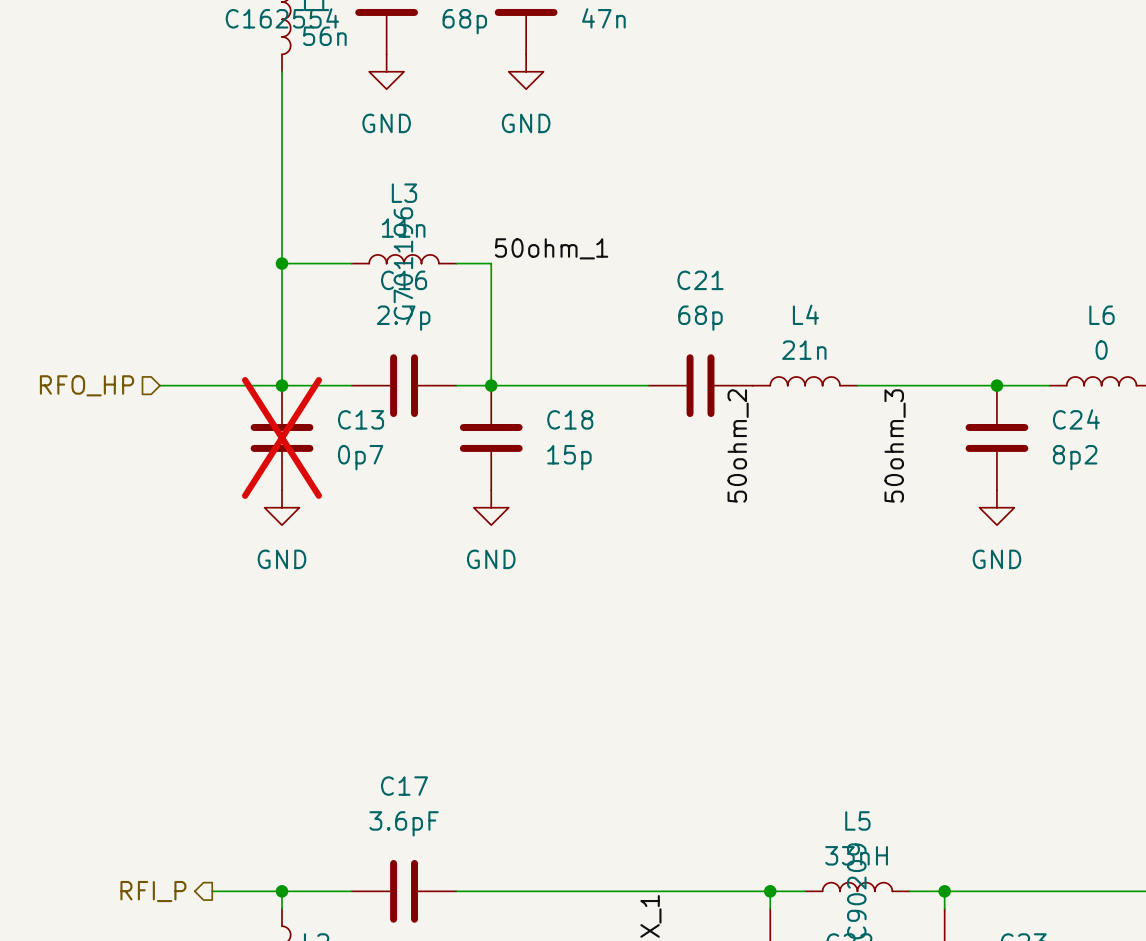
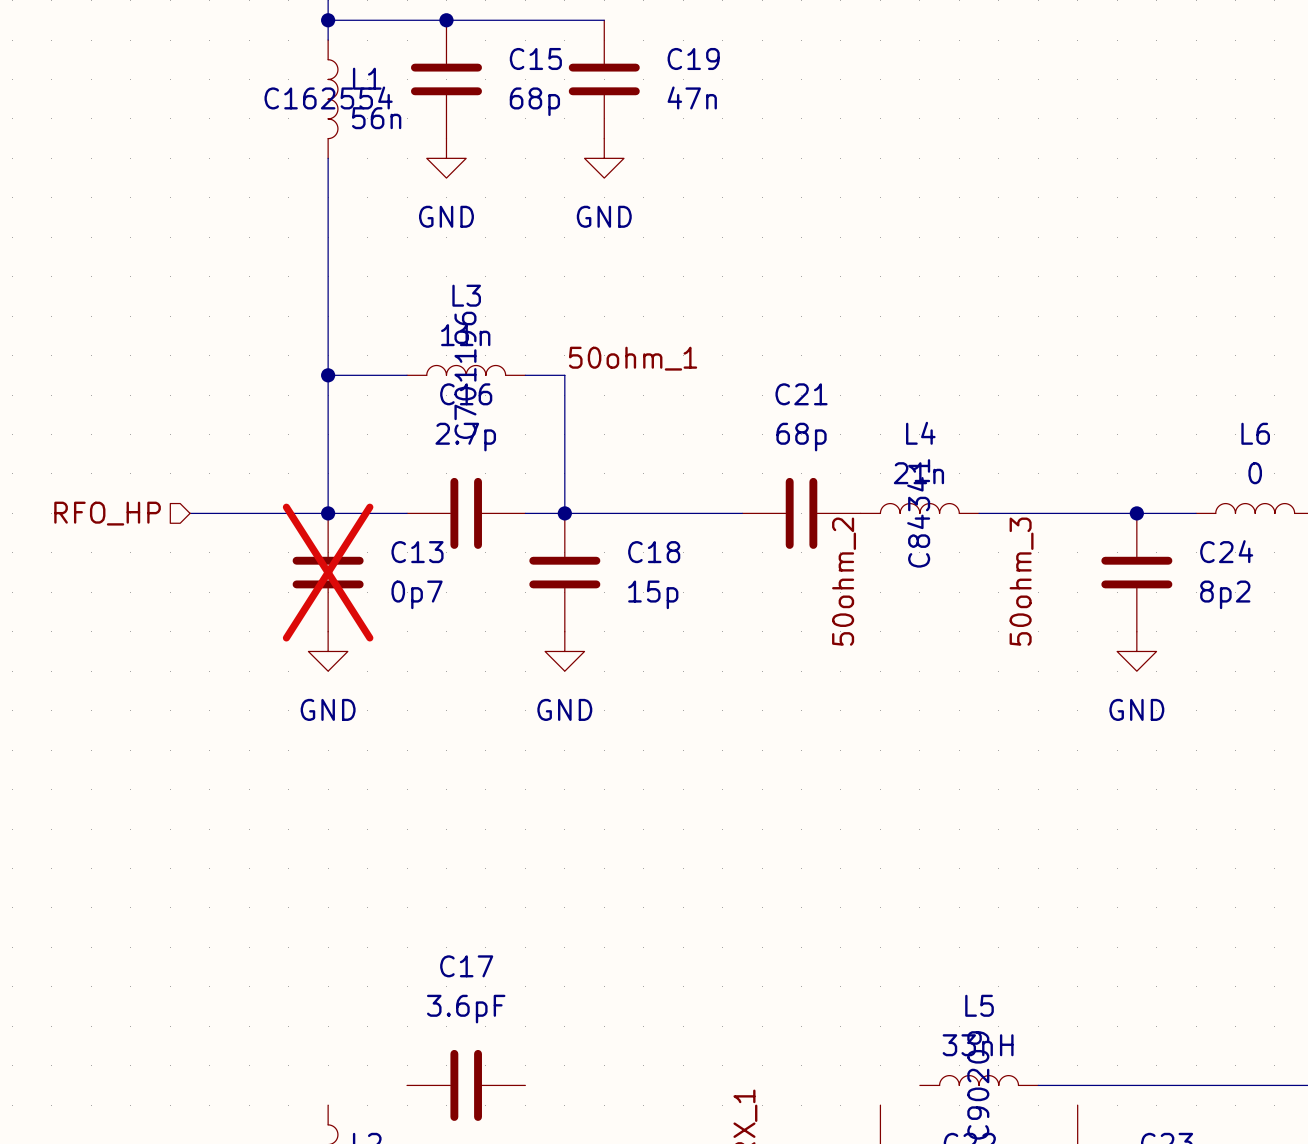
L4 text: none -> C84341 (918, 513)
hierarchical label: RFI_P (153, 891) -> none
wire: (212, 891) (351, 891) -> none
wire: (282, 891) (282, 908) -> none
junction: (282, 891) -> none
wire: (456, 891) (805, 891) -> none
wire: (770, 891) (770, 908) -> none
junction: (770, 891) -> none
wire: (944, 891) (944, 908) -> none
junction: (944, 891) -> none

